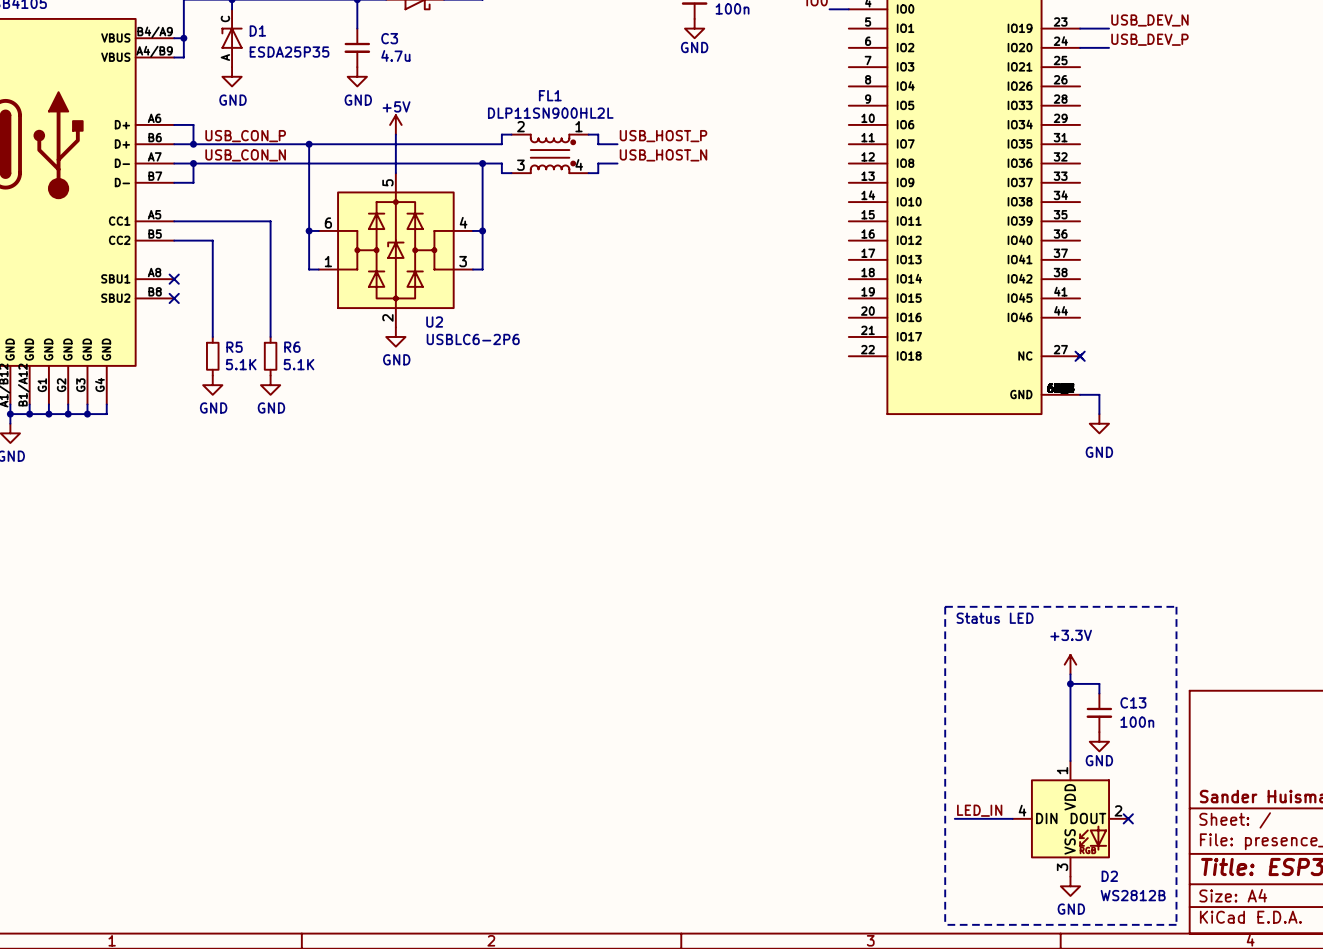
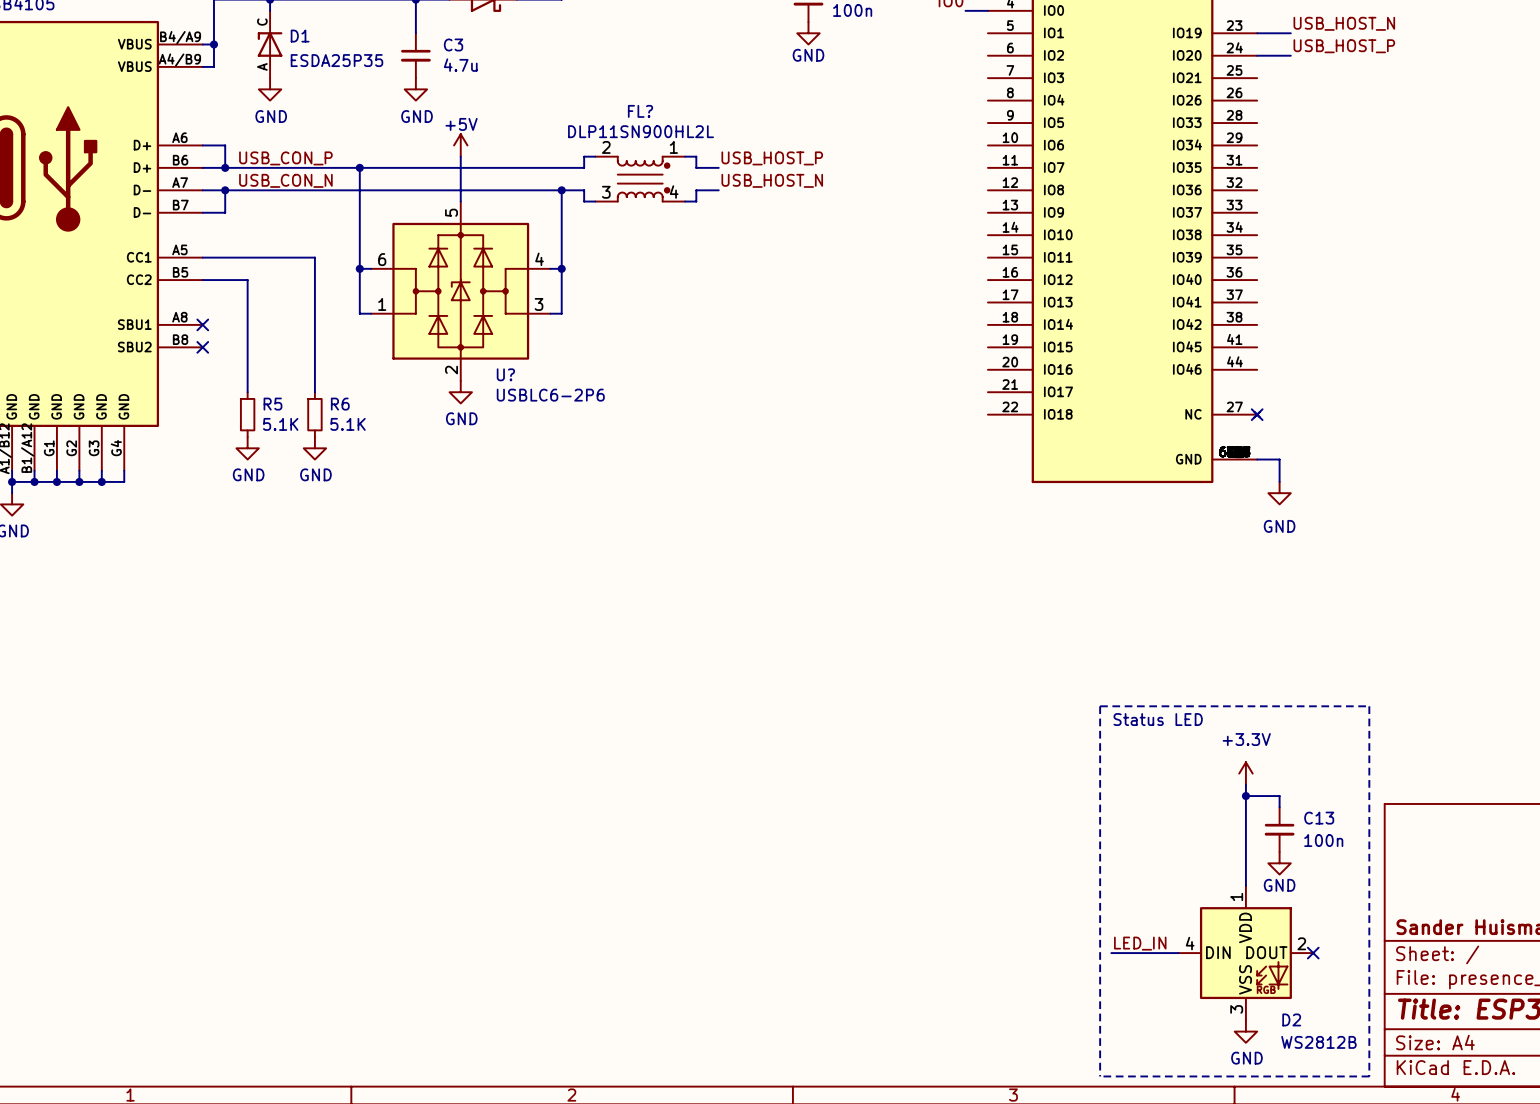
label: USB_DEV_N (1149, 20) -> USB_HOST_N (1344, 23)
label: USB_DEV_P (1149, 39) -> USB_HOST_P (1344, 46)
FL1 name: FL1 (550, 95) -> FL? (640, 111)
U2 name: U2 (434, 322) -> U? (505, 374)

